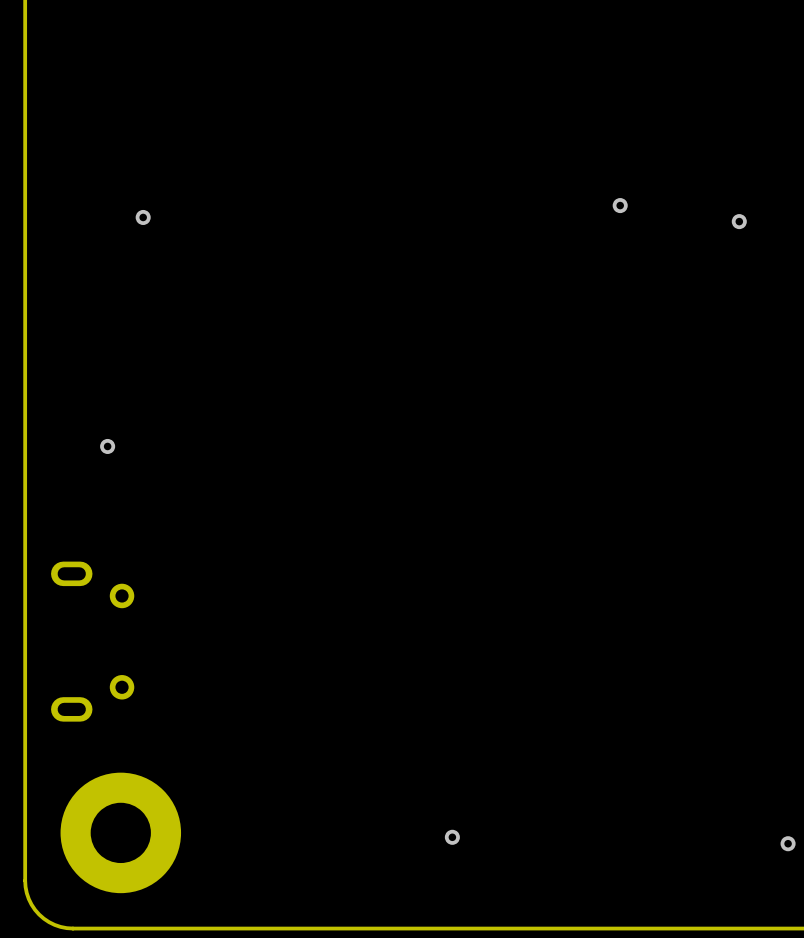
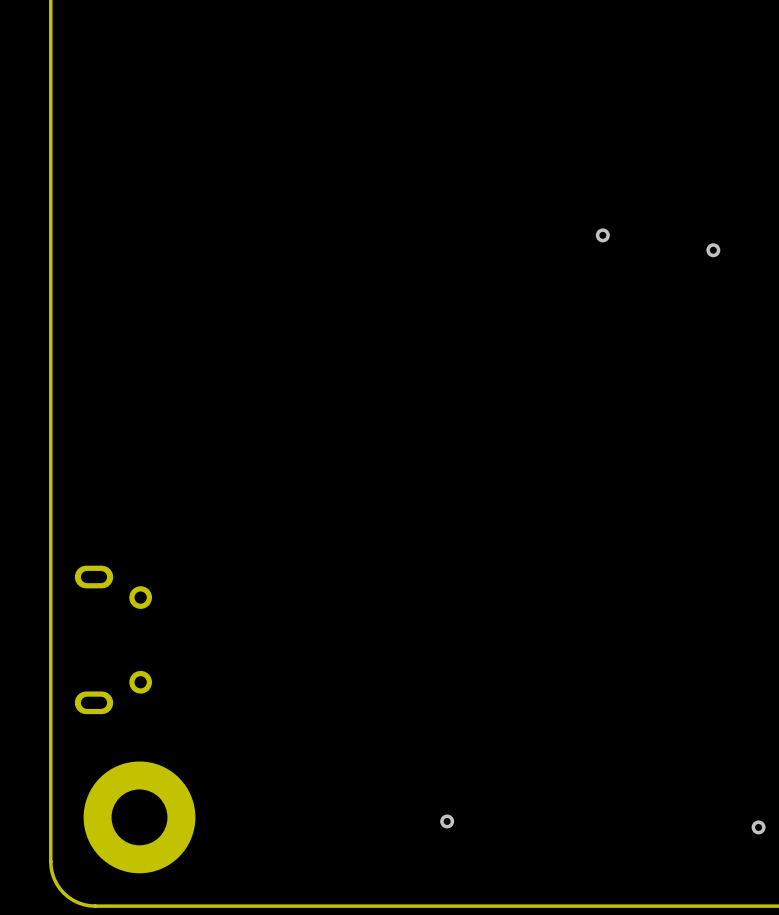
via: (143, 217) -> none
via: (107, 446) -> none

